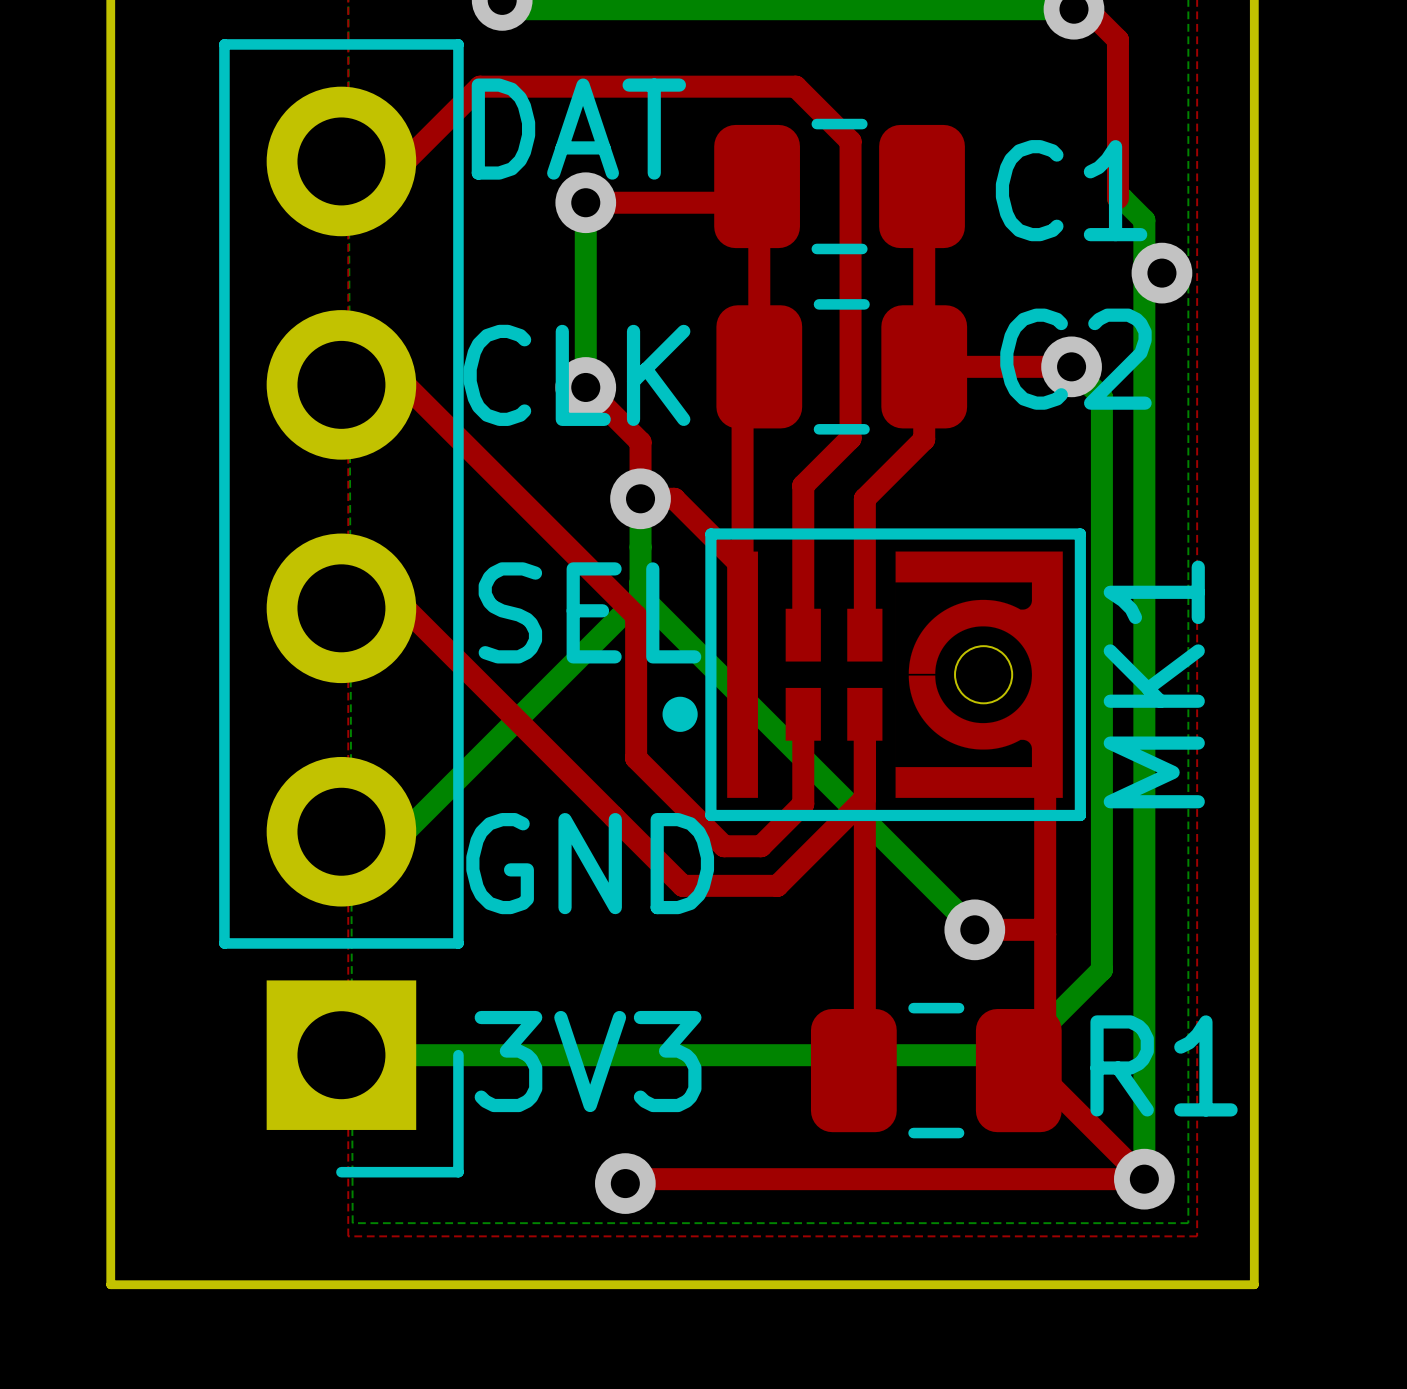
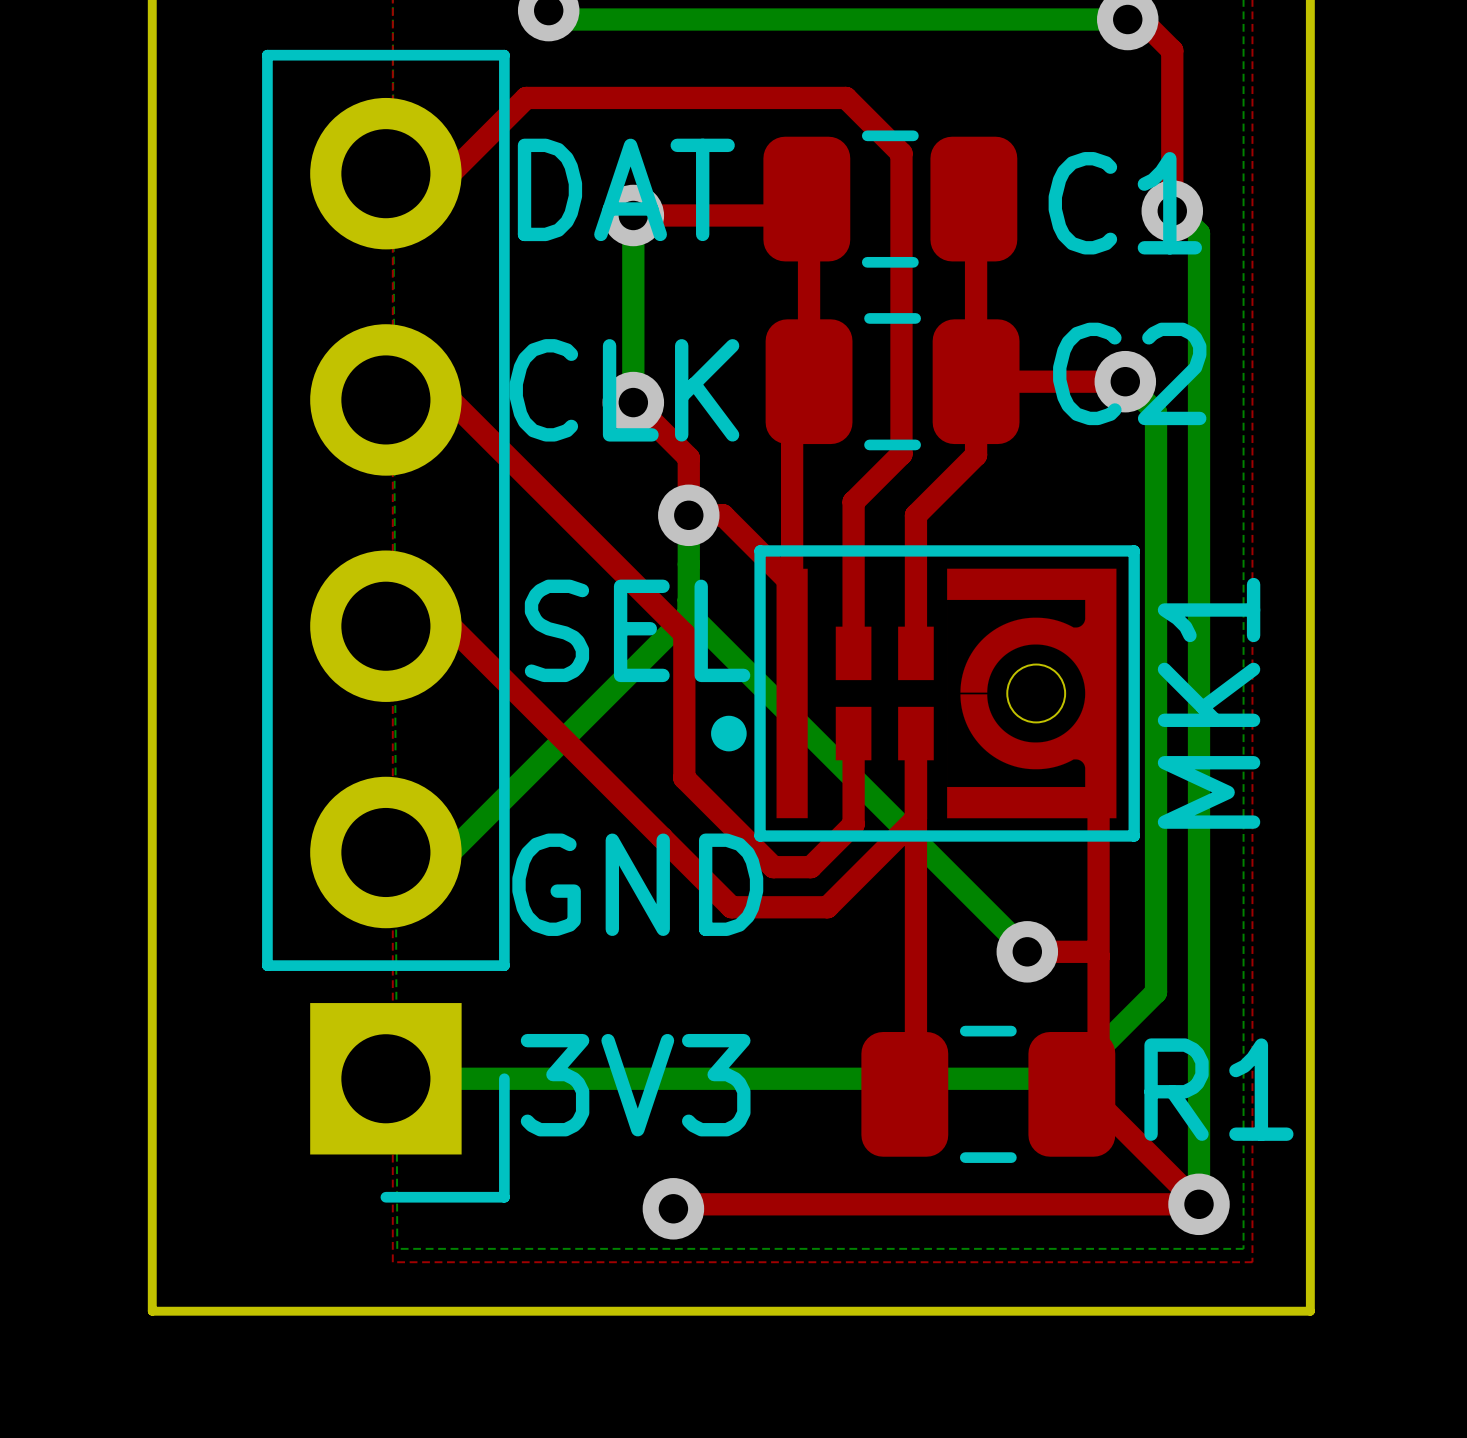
text position: DAT (578, 129) -> DAT (626, 189)
via position: (1161, 273) -> (1172, 211)

